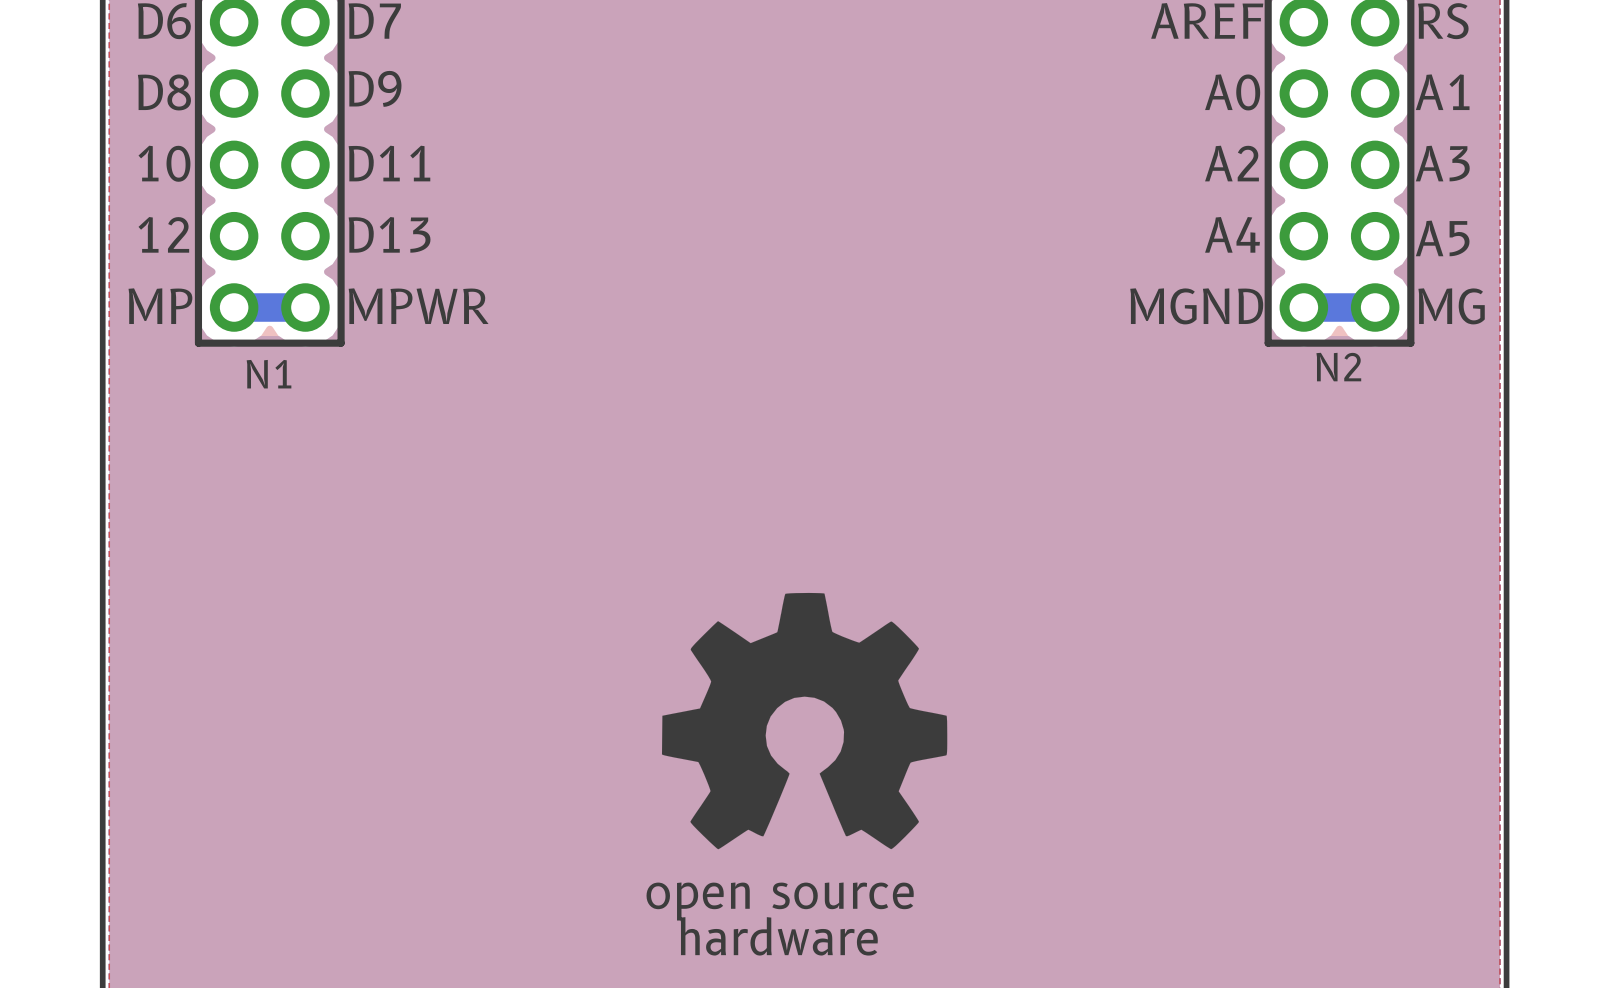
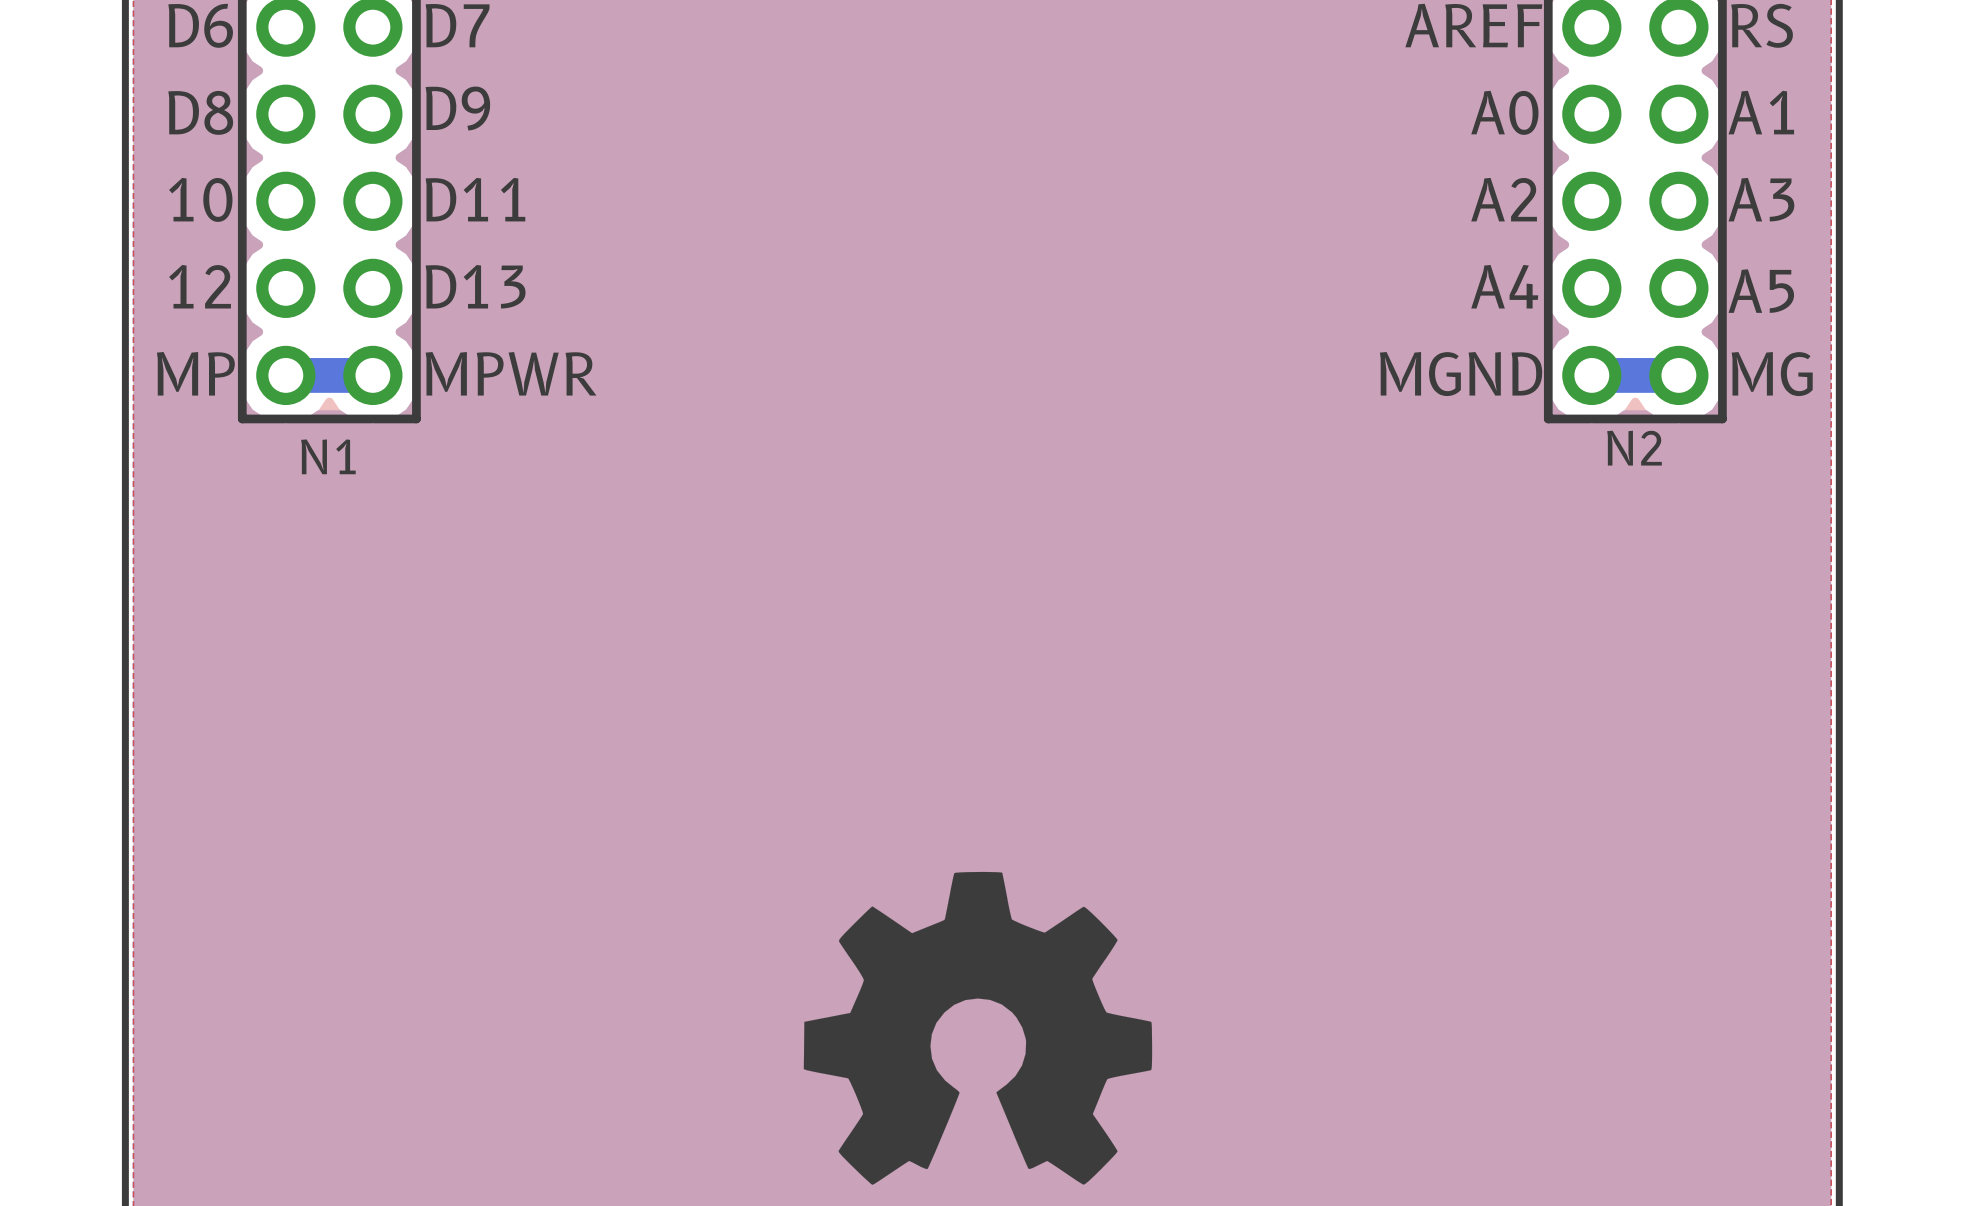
drawing position: (804, 721) -> (977, 1028)
text: open source (780, 901) -> none
text: hardware (779, 936) -> none

